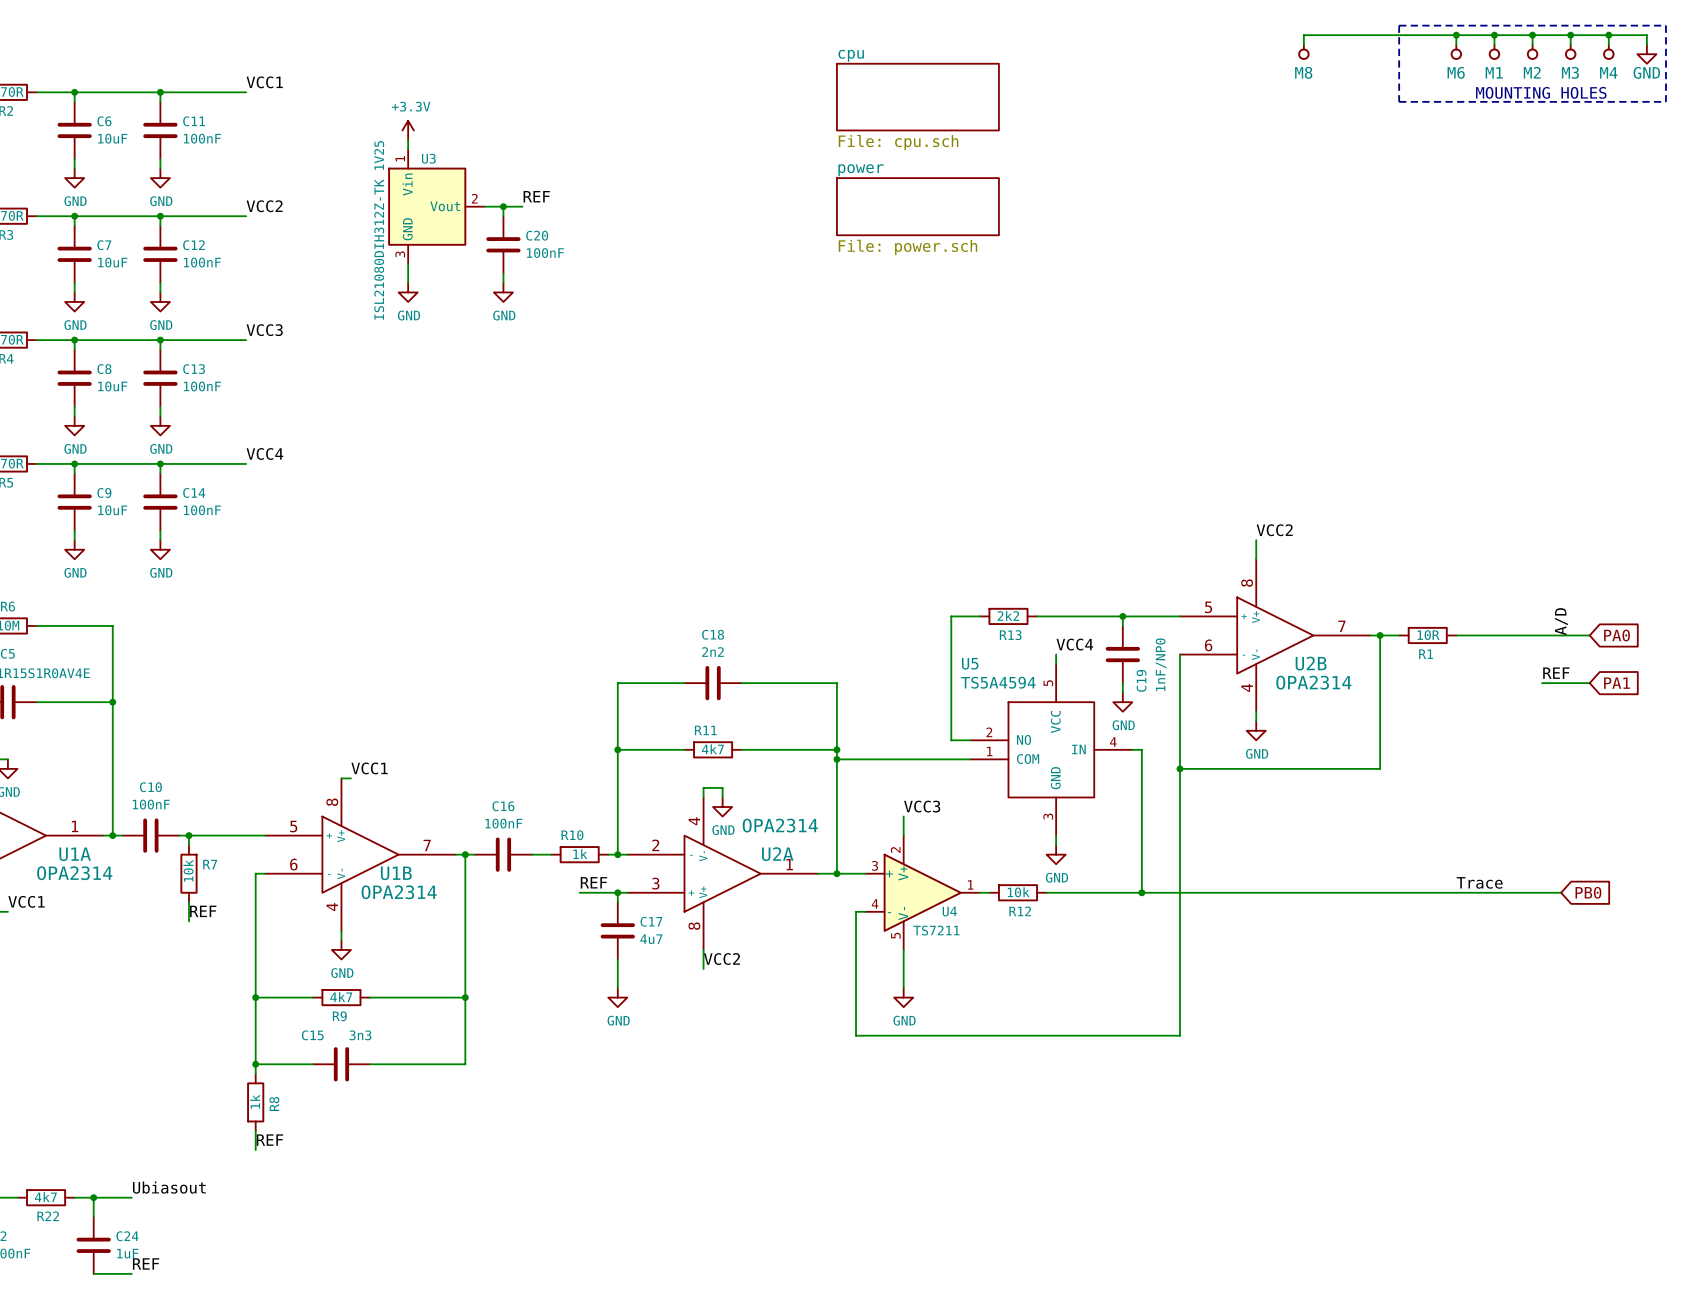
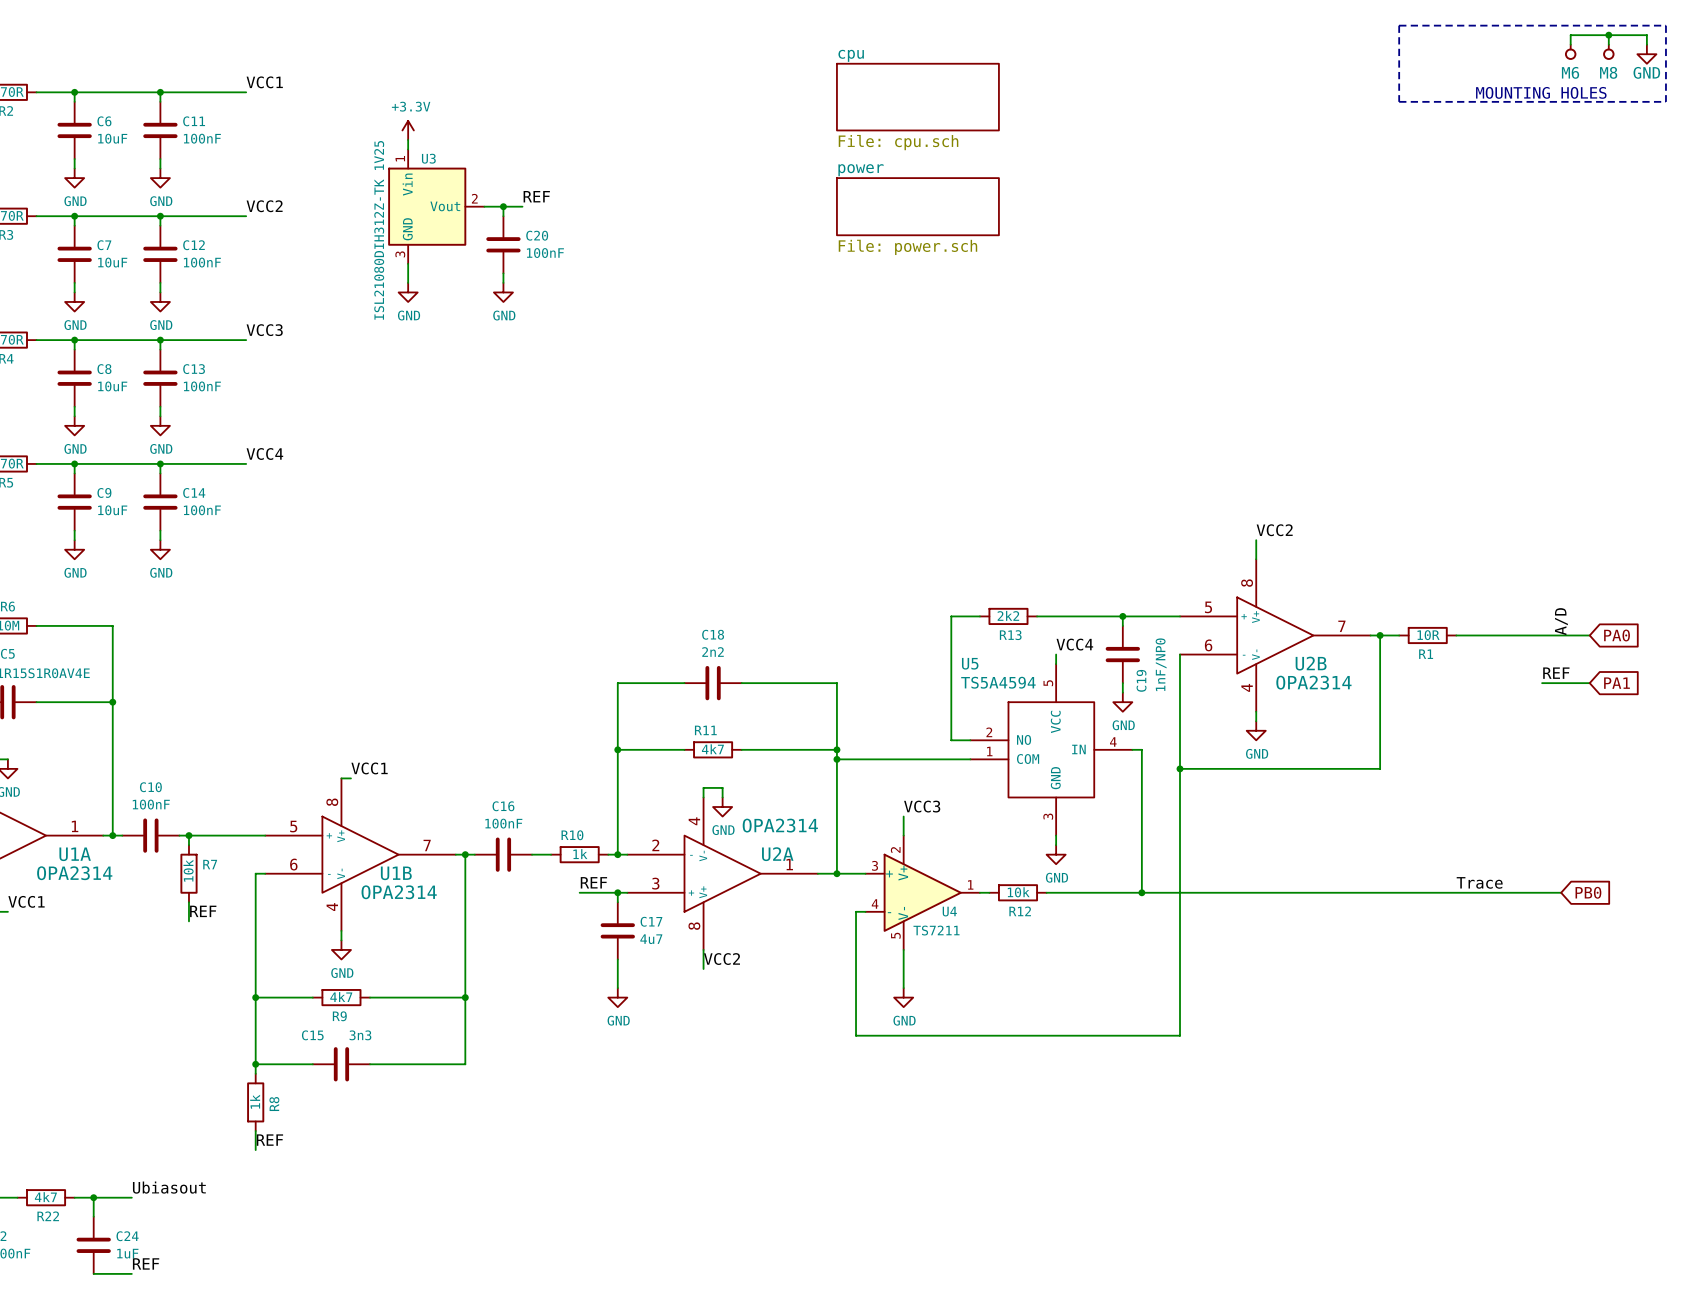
wire: (1456, 35) (1456, 44) -> none
junction: (1456, 35) -> none
wire: (1494, 35) (1494, 44) -> none
junction: (1494, 35) -> none
wire: (1532, 35) (1532, 44) -> none
junction: (1532, 35) -> none
wire: (1570, 35) (1303, 35) (1303, 44) -> none
junction: (1570, 35) -> none
M8: (1303, 52) -> none
M6: (1456, 52) -> none
M1: (1494, 52) -> none
M2: (1532, 52) -> none
M3 name: M3 (1570, 72) -> M6 (1570, 72)
M4 name: M4 (1608, 72) -> M8 (1608, 72)

